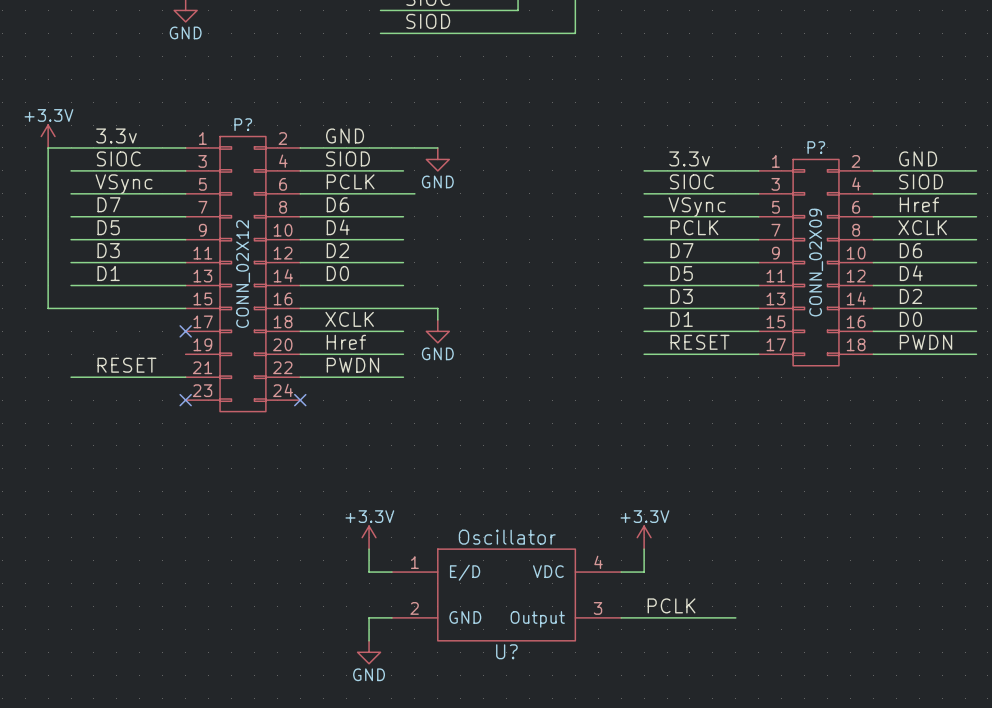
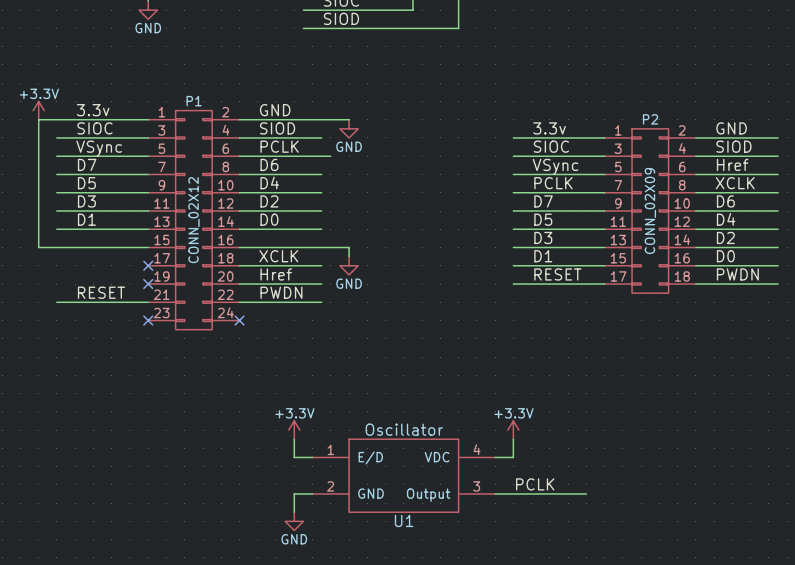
P? name: P? (243, 124) -> P1 (194, 101)
P? name: P? (816, 147) -> P2 (650, 119)
no-connect mark: none -> (148, 284)
U? name: U? (506, 651) -> U1 (404, 520)

